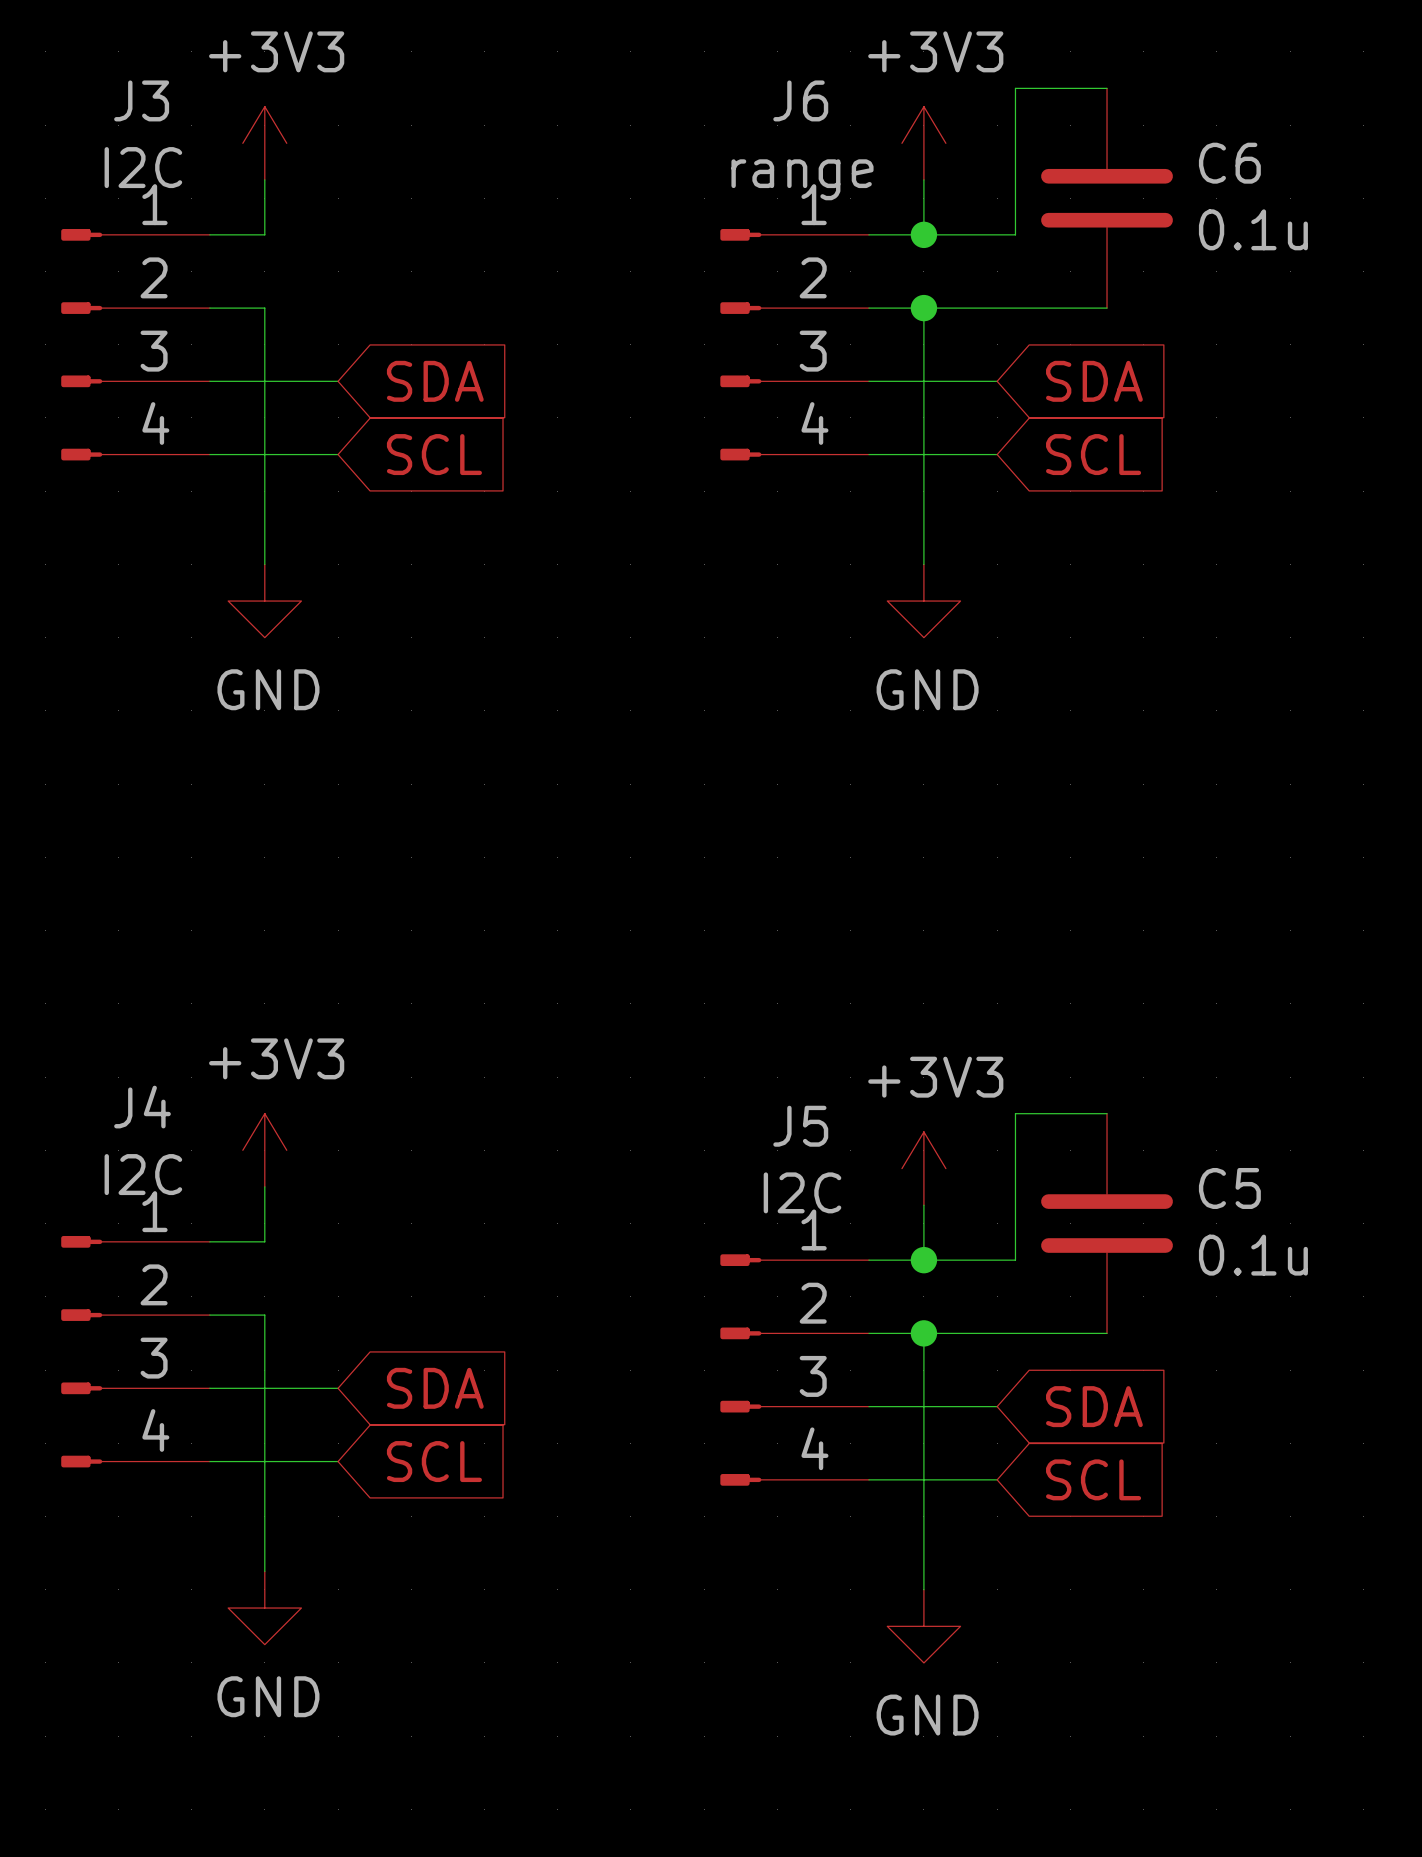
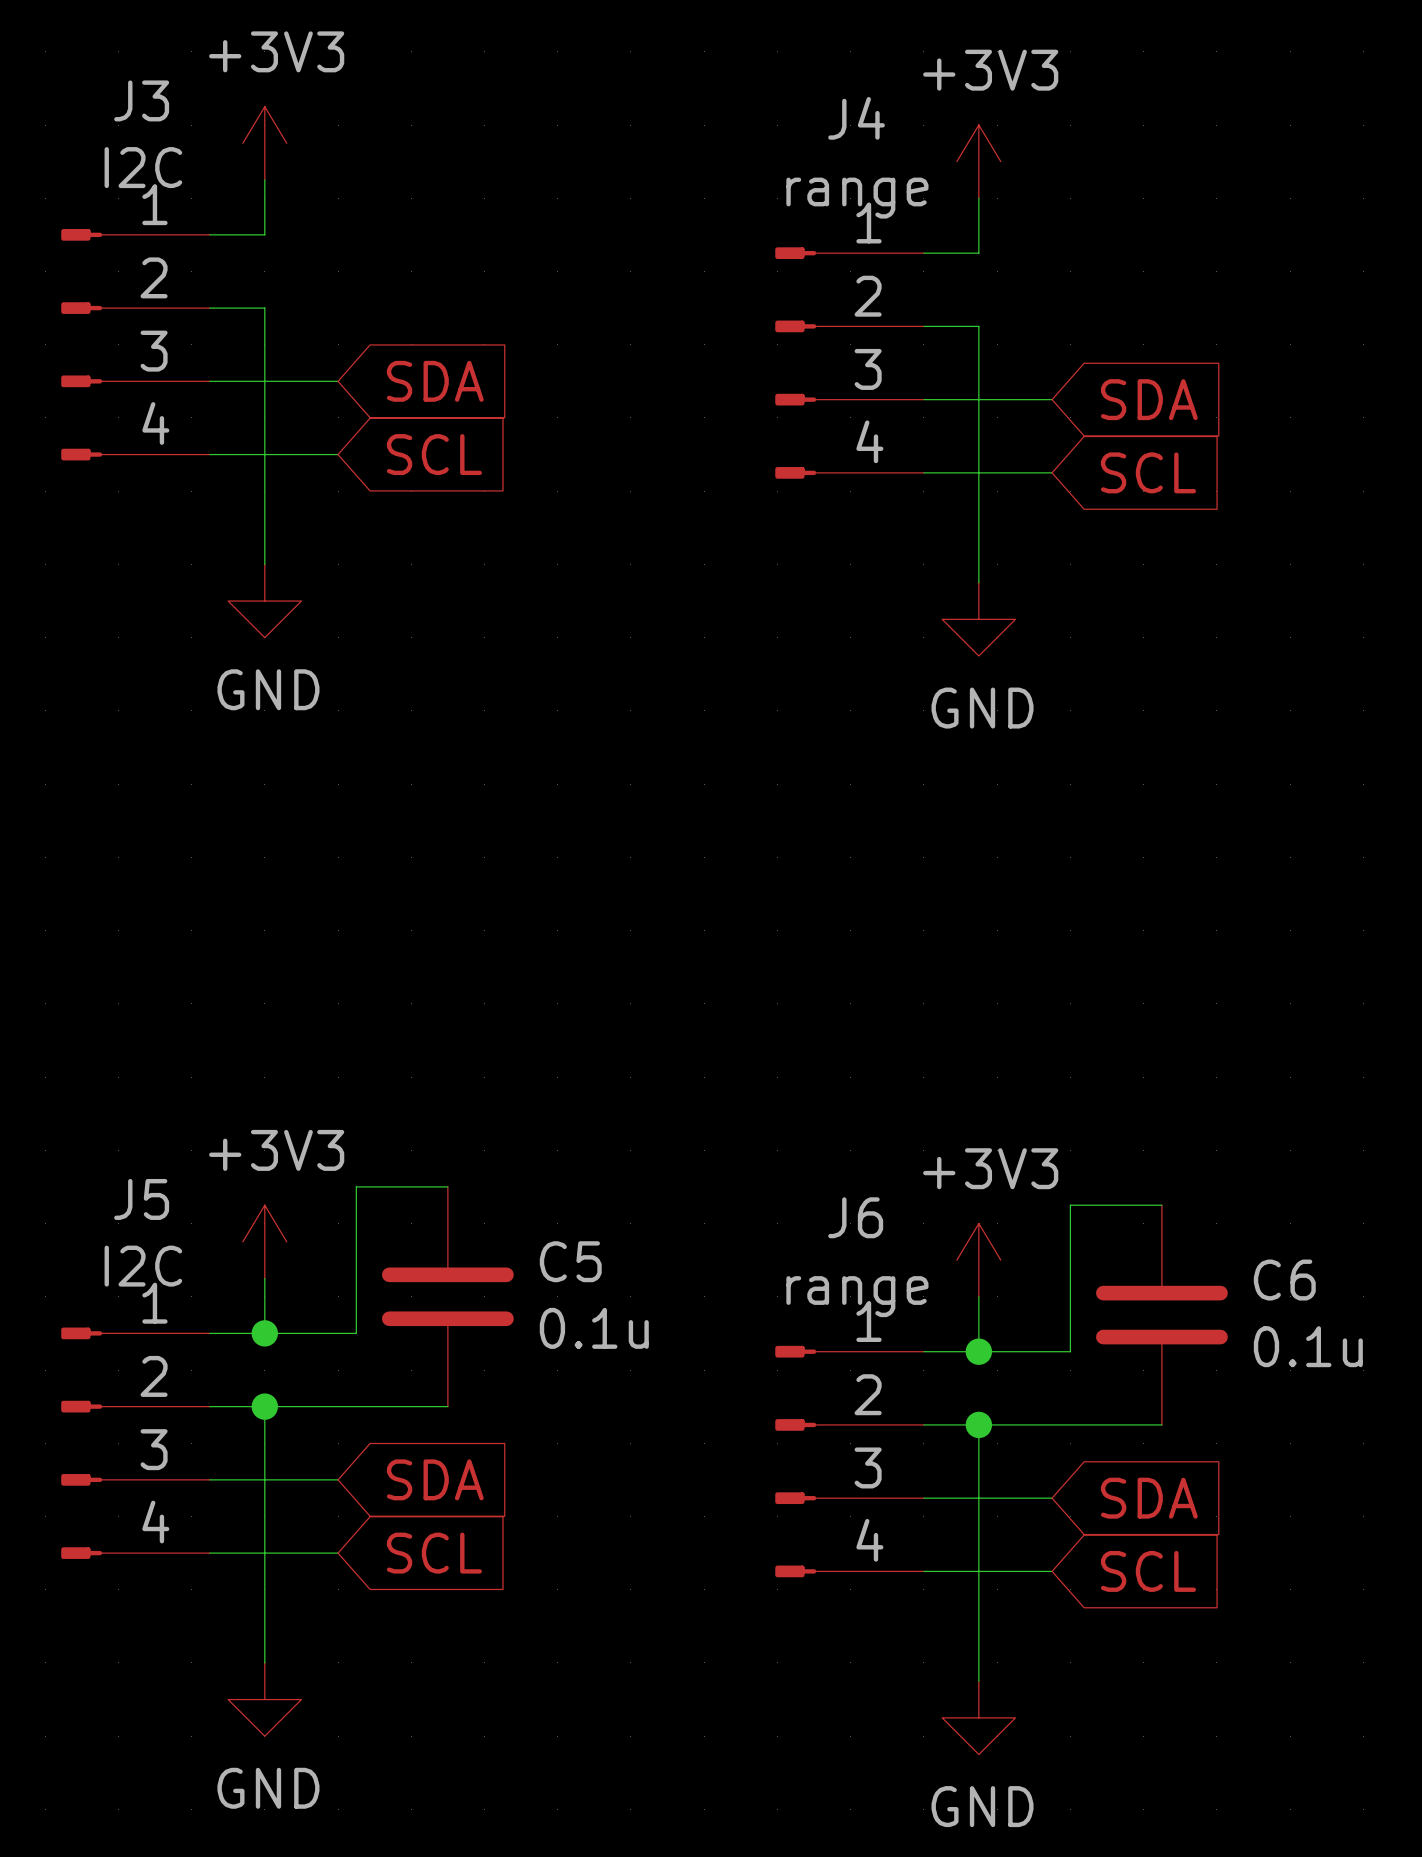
wire: (1107, 88) (1015, 88) (1015, 234) (869, 234) -> none
power symbol position: +3V3 (923, 143) -> +3V3 (978, 161)
wire: (923, 179) (923, 234) -> none
wire: none -> (978, 198) (978, 253) (923, 253)
C6 position: (1107, 198) -> (1161, 1315)
junction: (923, 234) -> none
wire: (869, 308) (1107, 308) -> none
wire: (923, 308) (923, 564) -> none
junction: (923, 308) -> none
wire: none -> (923, 326) (978, 326) (978, 582)
J6 position: (794, 344) -> (849, 1461)
wire: (869, 381) (997, 381) -> (923, 472) (1052, 472)
global label position: SDA (1094, 381) -> SDA (1149, 399)
wire: (869, 454) (997, 454) -> (923, 399) (1052, 399)
global label position: SCL (1093, 454) -> SCL (1148, 472)
power symbol position: GND (923, 601) -> GND (978, 619)
wire: (1107, 1113) (1015, 1113) (1015, 1260) (869, 1260) -> (1161, 1205) (1070, 1205) (1070, 1351) (923, 1351)
power symbol position: +3V3 (264, 1150) -> +3V3 (264, 1241)
power symbol position: +3V3 (923, 1168) -> +3V3 (978, 1260)
J4 value: I2C (143, 1174) -> range (857, 198)
wire: (264, 1186) (264, 1241) (209, 1241) -> none
wire: none -> (447, 1186) (356, 1186) (356, 1333) (209, 1333)
wire: (923, 1205) (923, 1260) -> (978, 1296) (978, 1351)
C5 position: (1107, 1223) -> (447, 1296)
junction: (923, 1260) -> none
wire: (209, 1315) (264, 1315) -> (264, 1278) (264, 1315)
wire: (264, 1333) (264, 1406) -> none
junction: none -> (264, 1333)
wire: (869, 1333) (1107, 1333) -> (923, 1424) (1161, 1424)
wire: (923, 1333) (923, 1589) -> (978, 1424) (978, 1681)
junction: (923, 1333) -> none
J4 position: (135, 1351) -> (849, 363)
junction: none -> (978, 1351)
J5 position: (794, 1370) -> (135, 1443)
wire: (209, 1388) (338, 1388) -> (209, 1479) (338, 1479)
global label position: SDA (435, 1388) -> SDA (435, 1479)
wire: none -> (209, 1406) (447, 1406)
junction: none -> (264, 1406)
wire: (869, 1406) (997, 1406) -> (923, 1498) (1052, 1498)
global label position: SDA (1094, 1406) -> SDA (1149, 1498)
junction: none -> (978, 1424)
wire: (209, 1461) (338, 1461) -> (209, 1553) (338, 1553)
global label position: SCL (434, 1461) -> SCL (434, 1553)
wire: (869, 1479) (997, 1479) -> (923, 1571) (1052, 1571)
global label position: SCL (1093, 1479) -> SCL (1148, 1571)
wire: none -> (264, 1571) (264, 1662)
power symbol position: GND (264, 1608) -> GND (264, 1699)
power symbol position: GND (923, 1626) -> GND (978, 1717)

